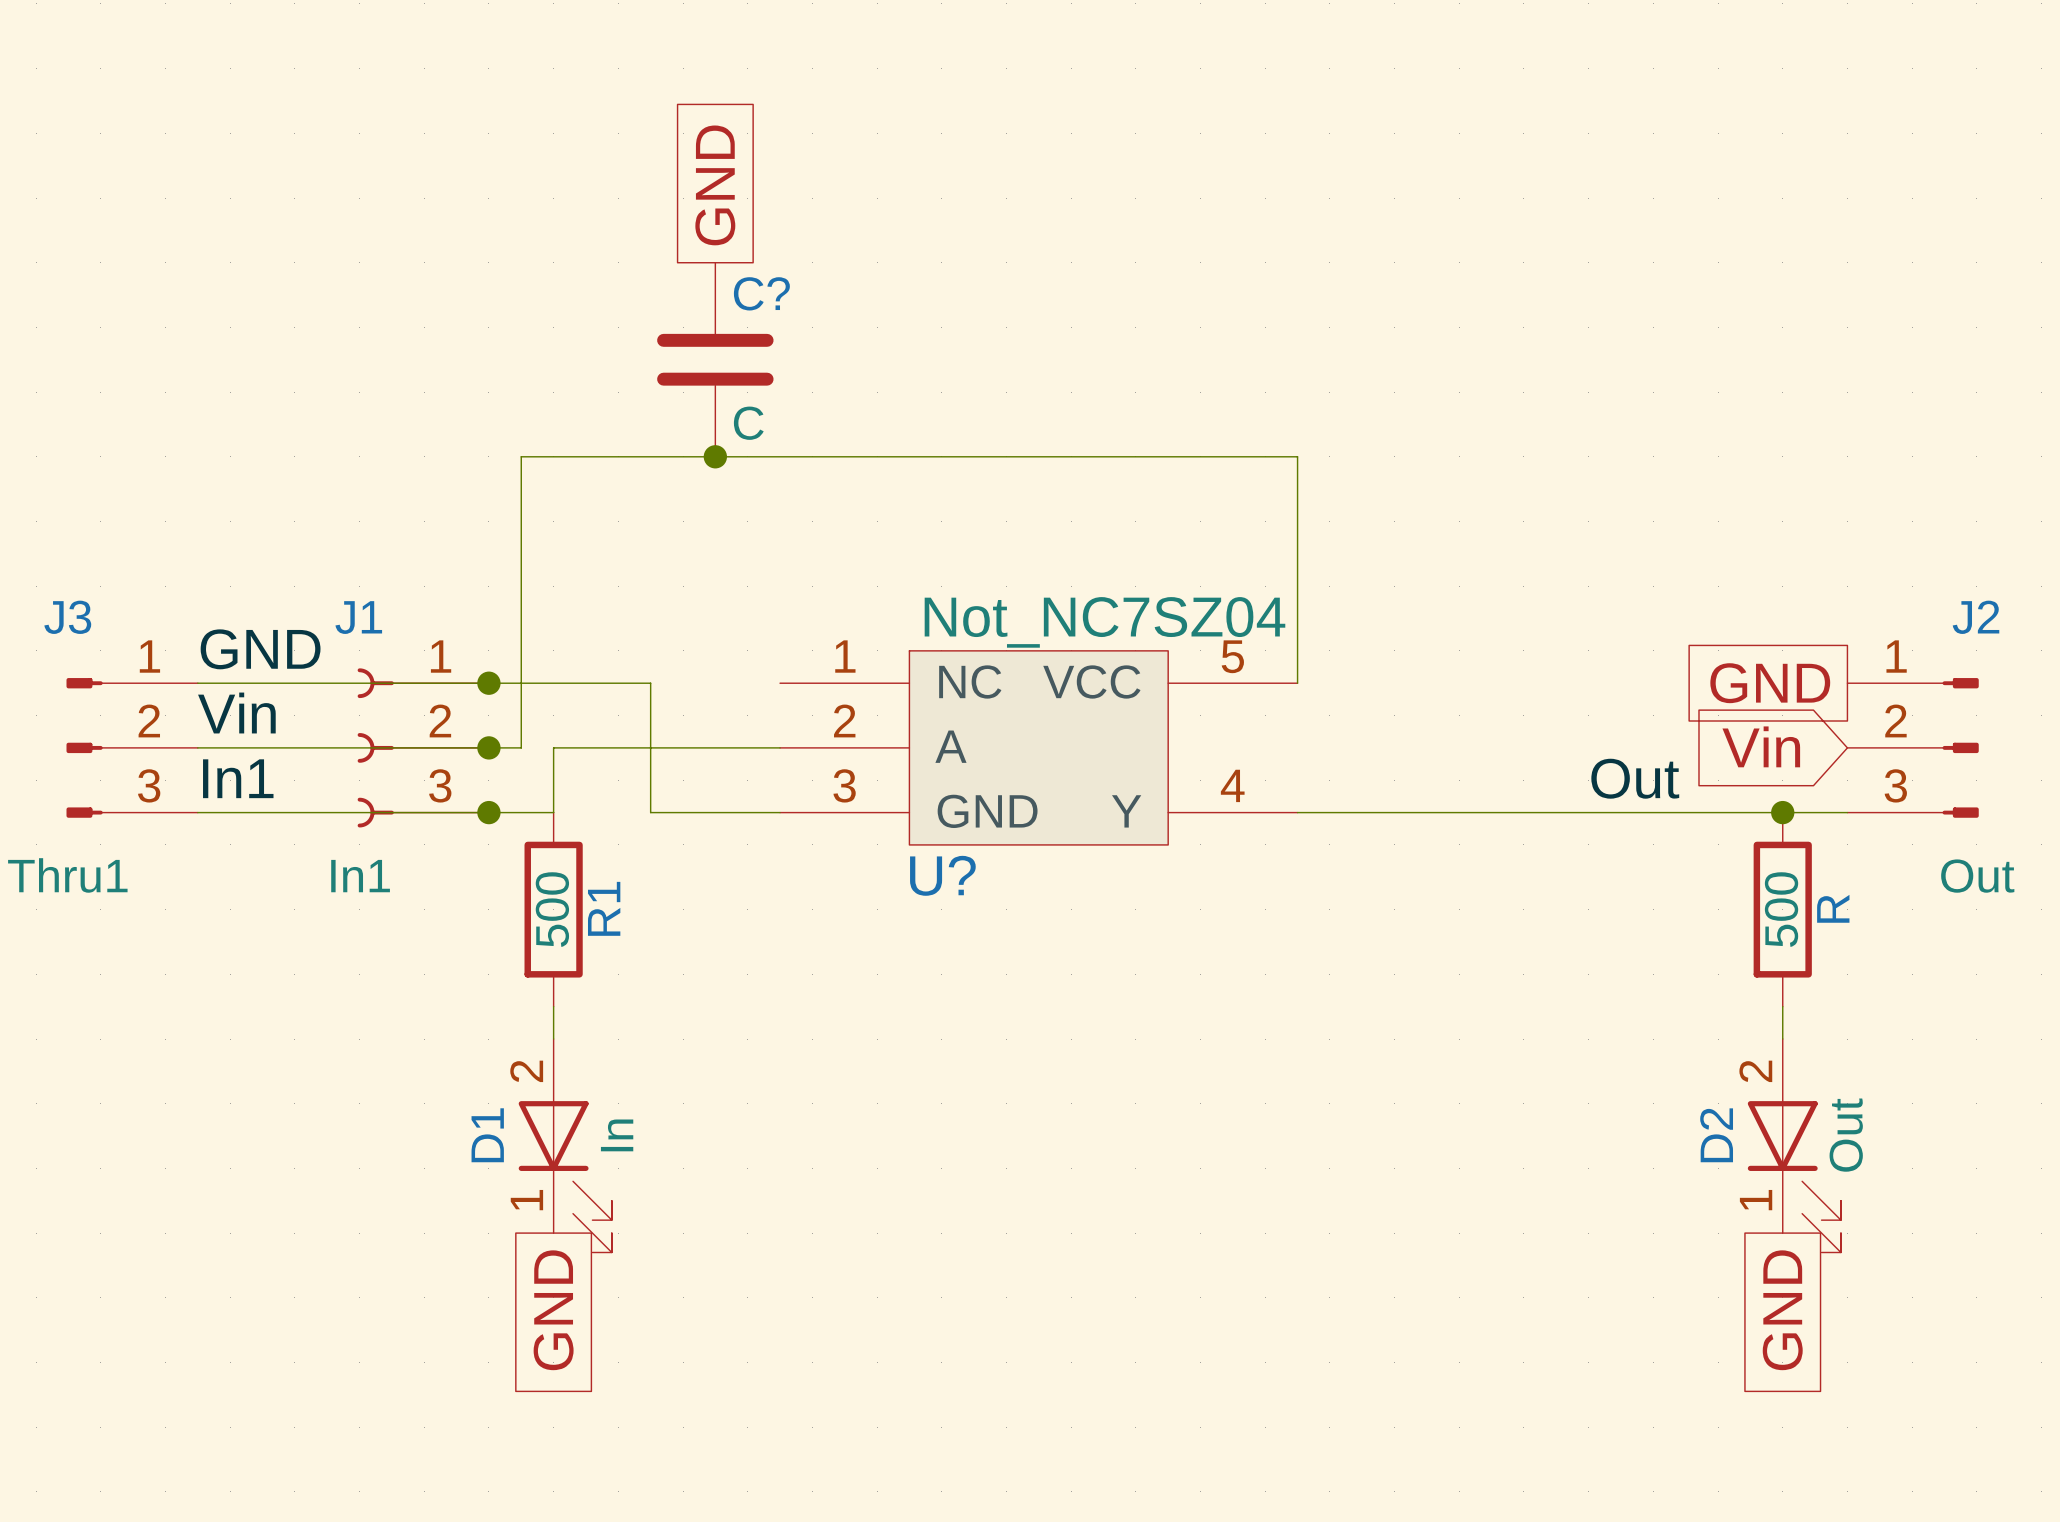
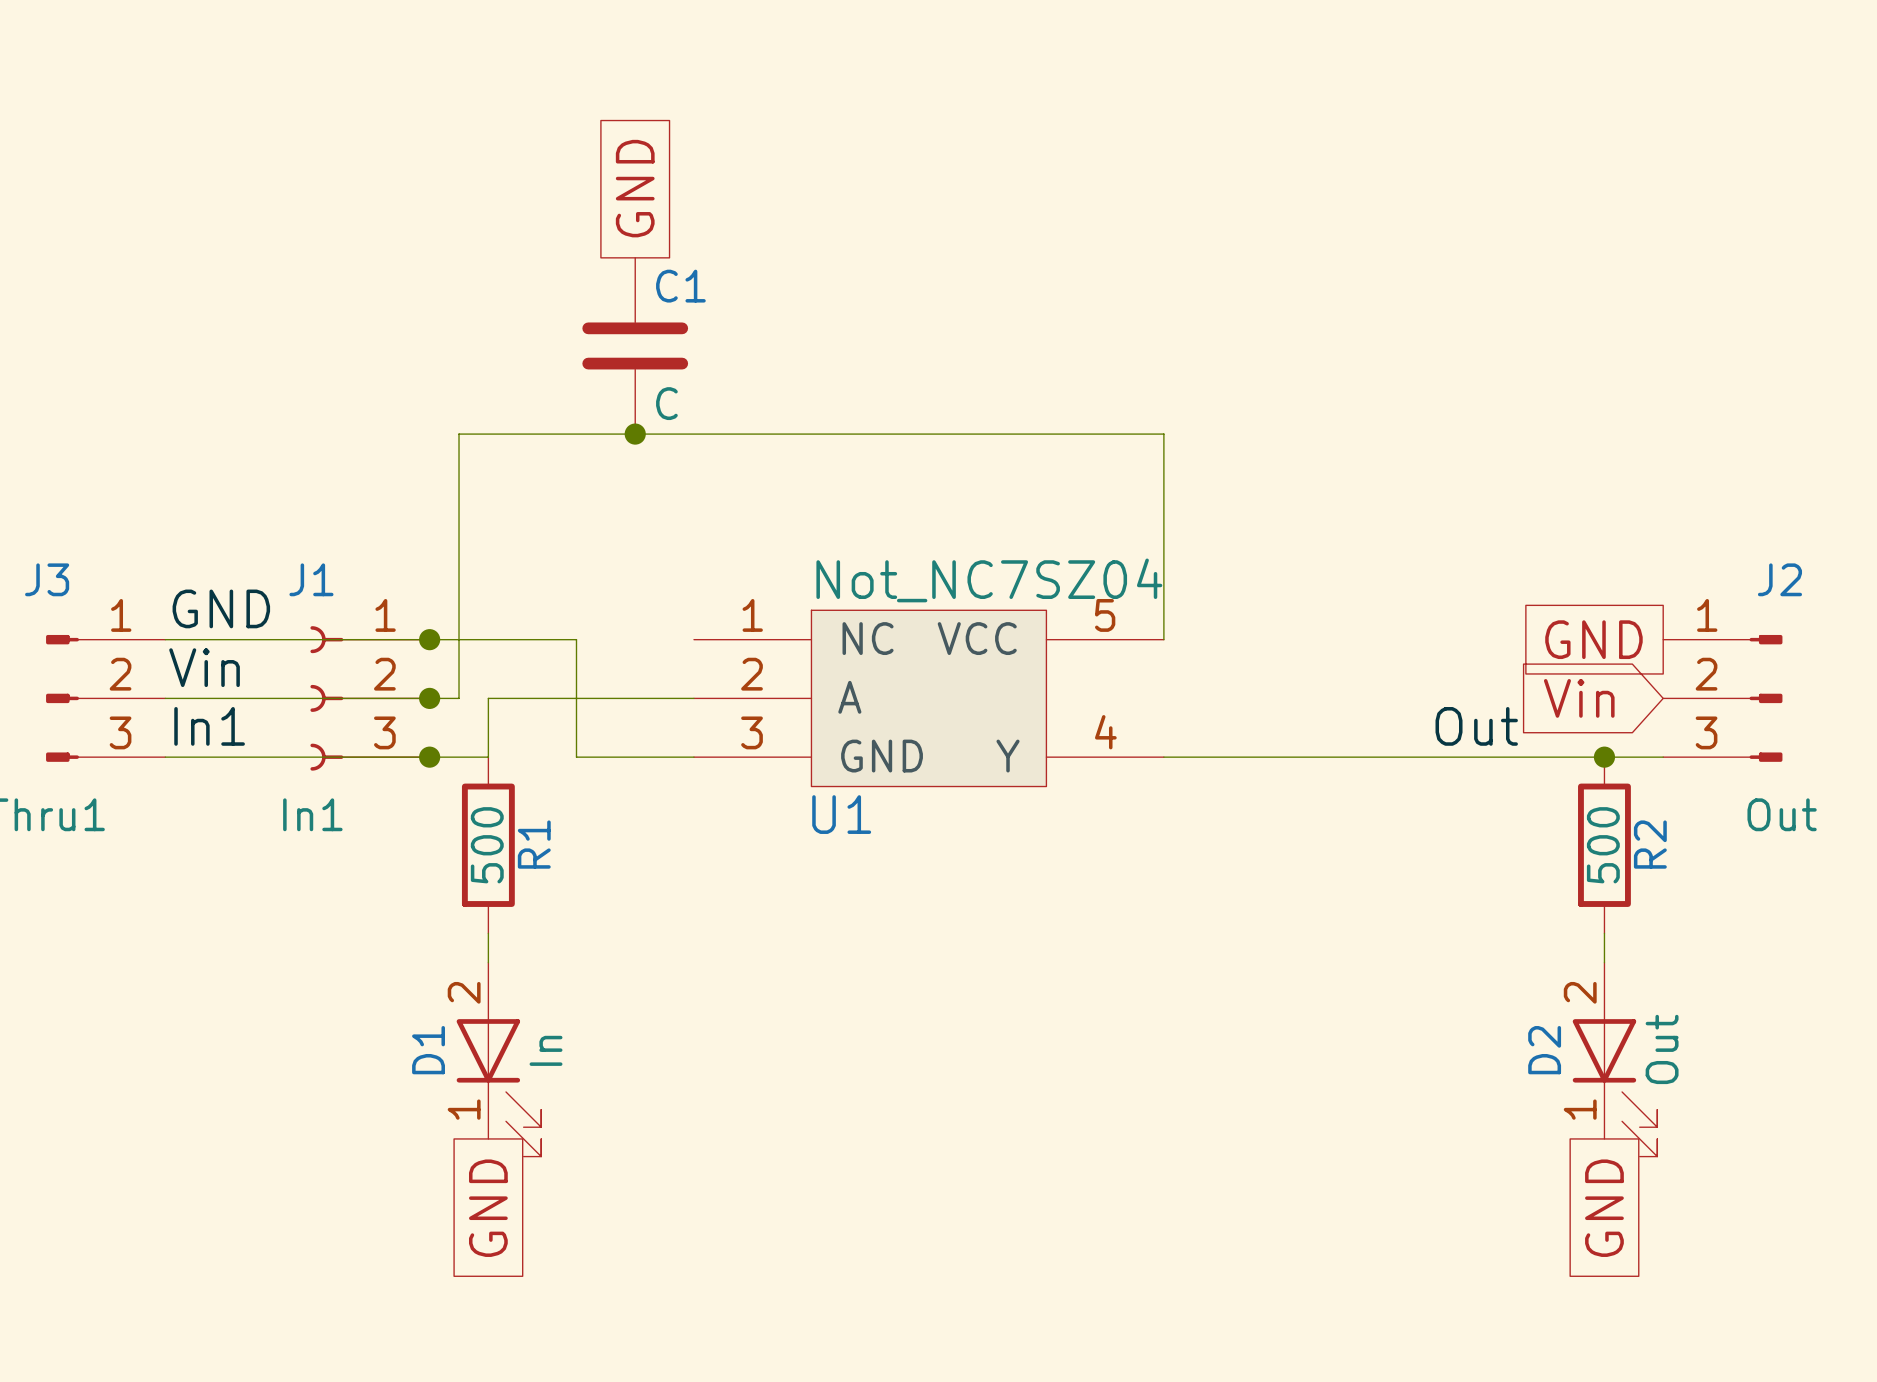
C? name: C? (761, 293) -> C1 (680, 286)
U? name: U? (942, 875) -> U1 (841, 814)
R name: R (1833, 908) -> R2 (1650, 844)

